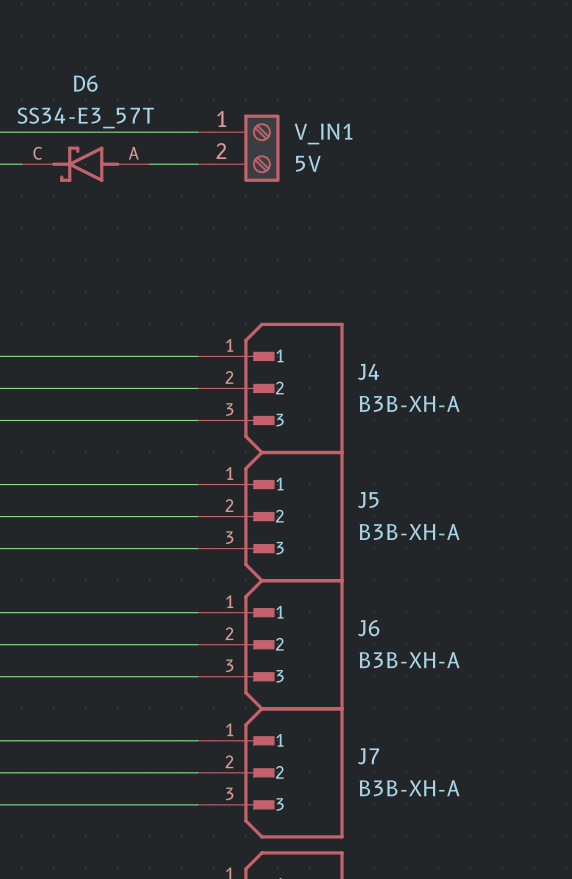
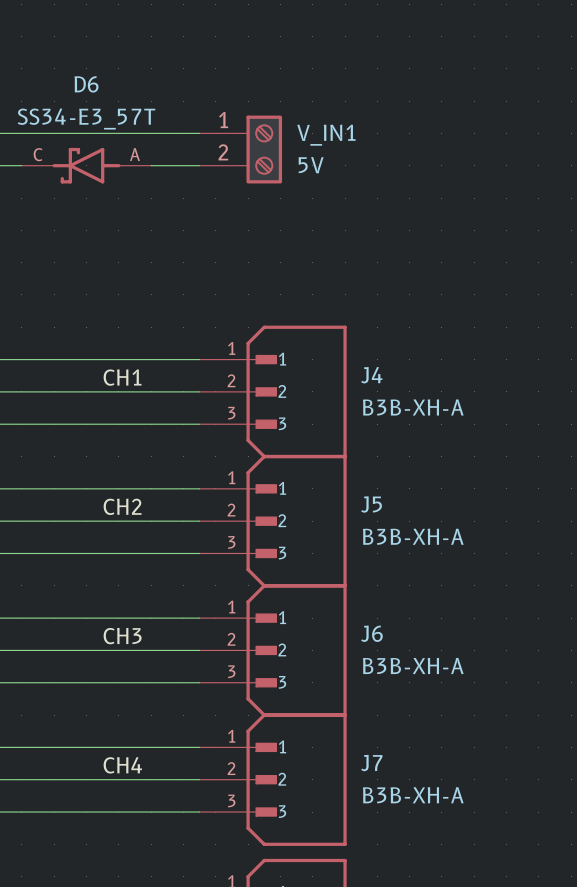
label: none -> CH1 (122, 377)
label: none -> CH2 (122, 506)
label: none -> CH3 (122, 636)
label: none -> CH4 (122, 765)

